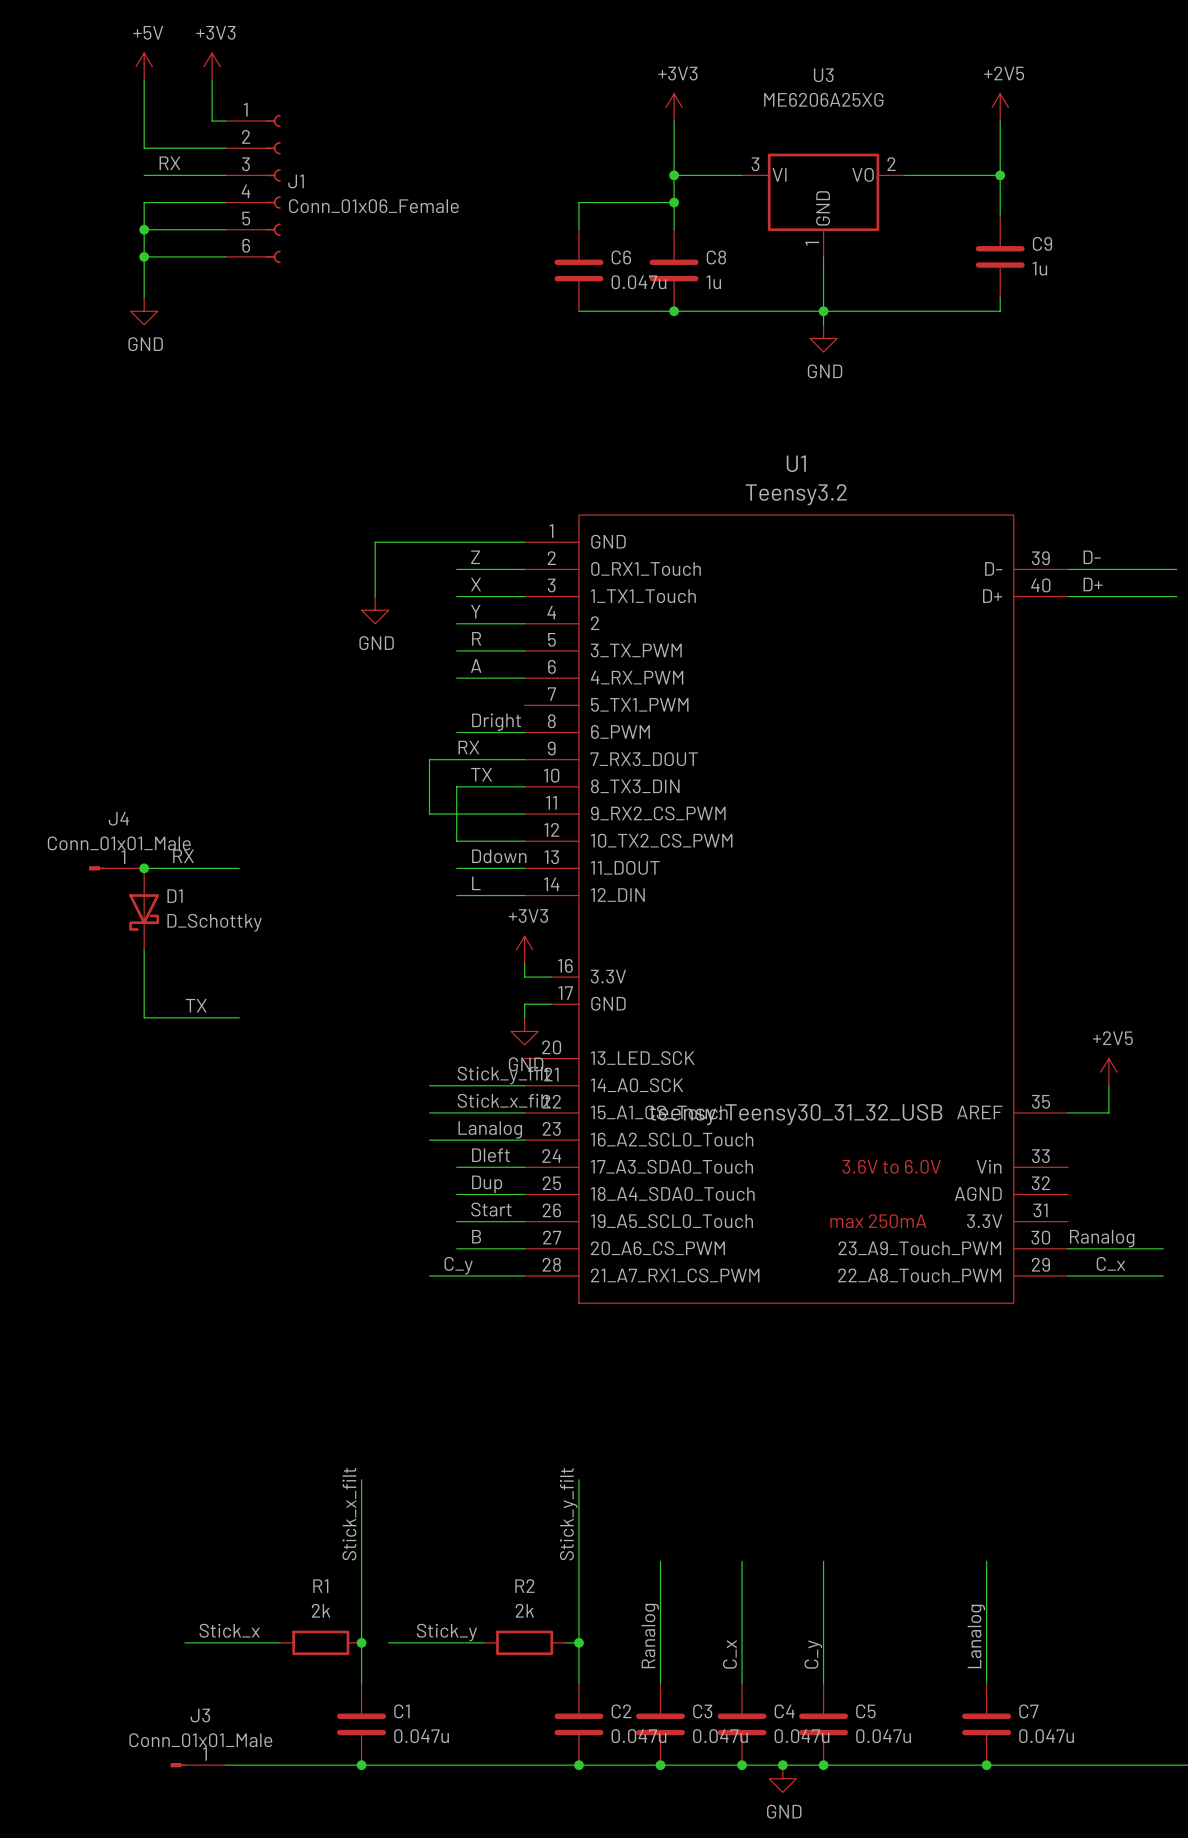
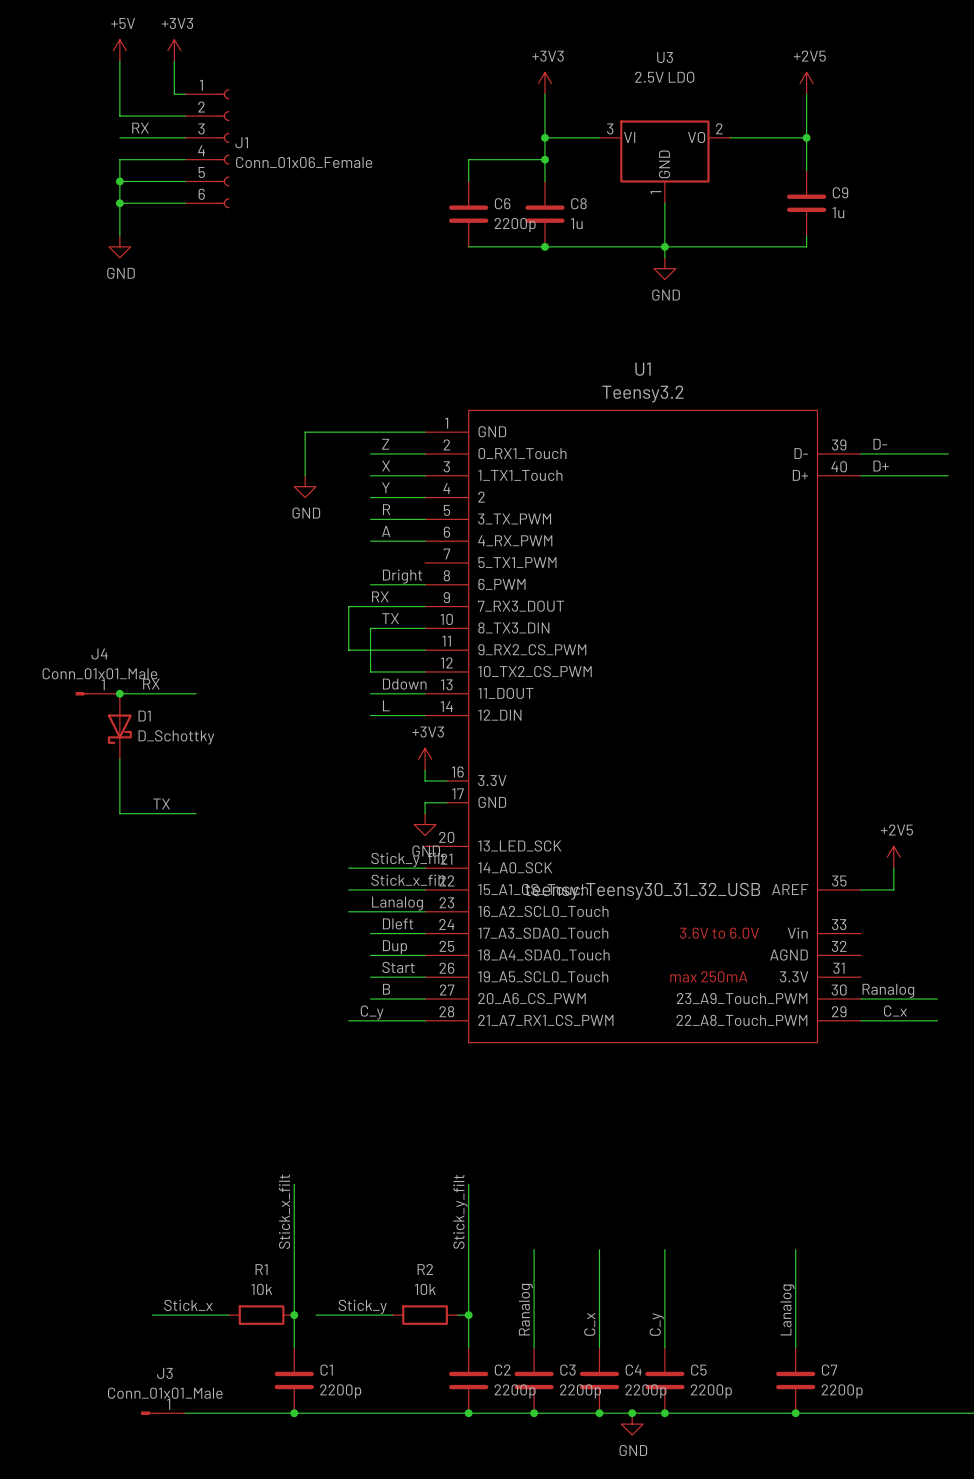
U3 value: ME6206A25XG (823, 99) -> 2.5V LDO (664, 77)
C6 value: 0.047u (638, 282) -> 2200p (515, 225)
R1 value: 2k (321, 1610) -> 10k (261, 1289)
R2 value: 2k (524, 1610) -> 10k (425, 1289)
C1 value: 0.047u (421, 1736) -> 2200p (340, 1391)
C2 value: 0.047u (638, 1736) -> 2200p (515, 1391)
C3 value: 0.047u (720, 1736) -> 2200p (580, 1391)
C4 value: 0.047u (802, 1736) -> 2200p (645, 1391)
C5 value: 0.047u (883, 1736) -> 2200p (711, 1391)
C7 value: 0.047u (1046, 1736) -> 2200p (842, 1391)

